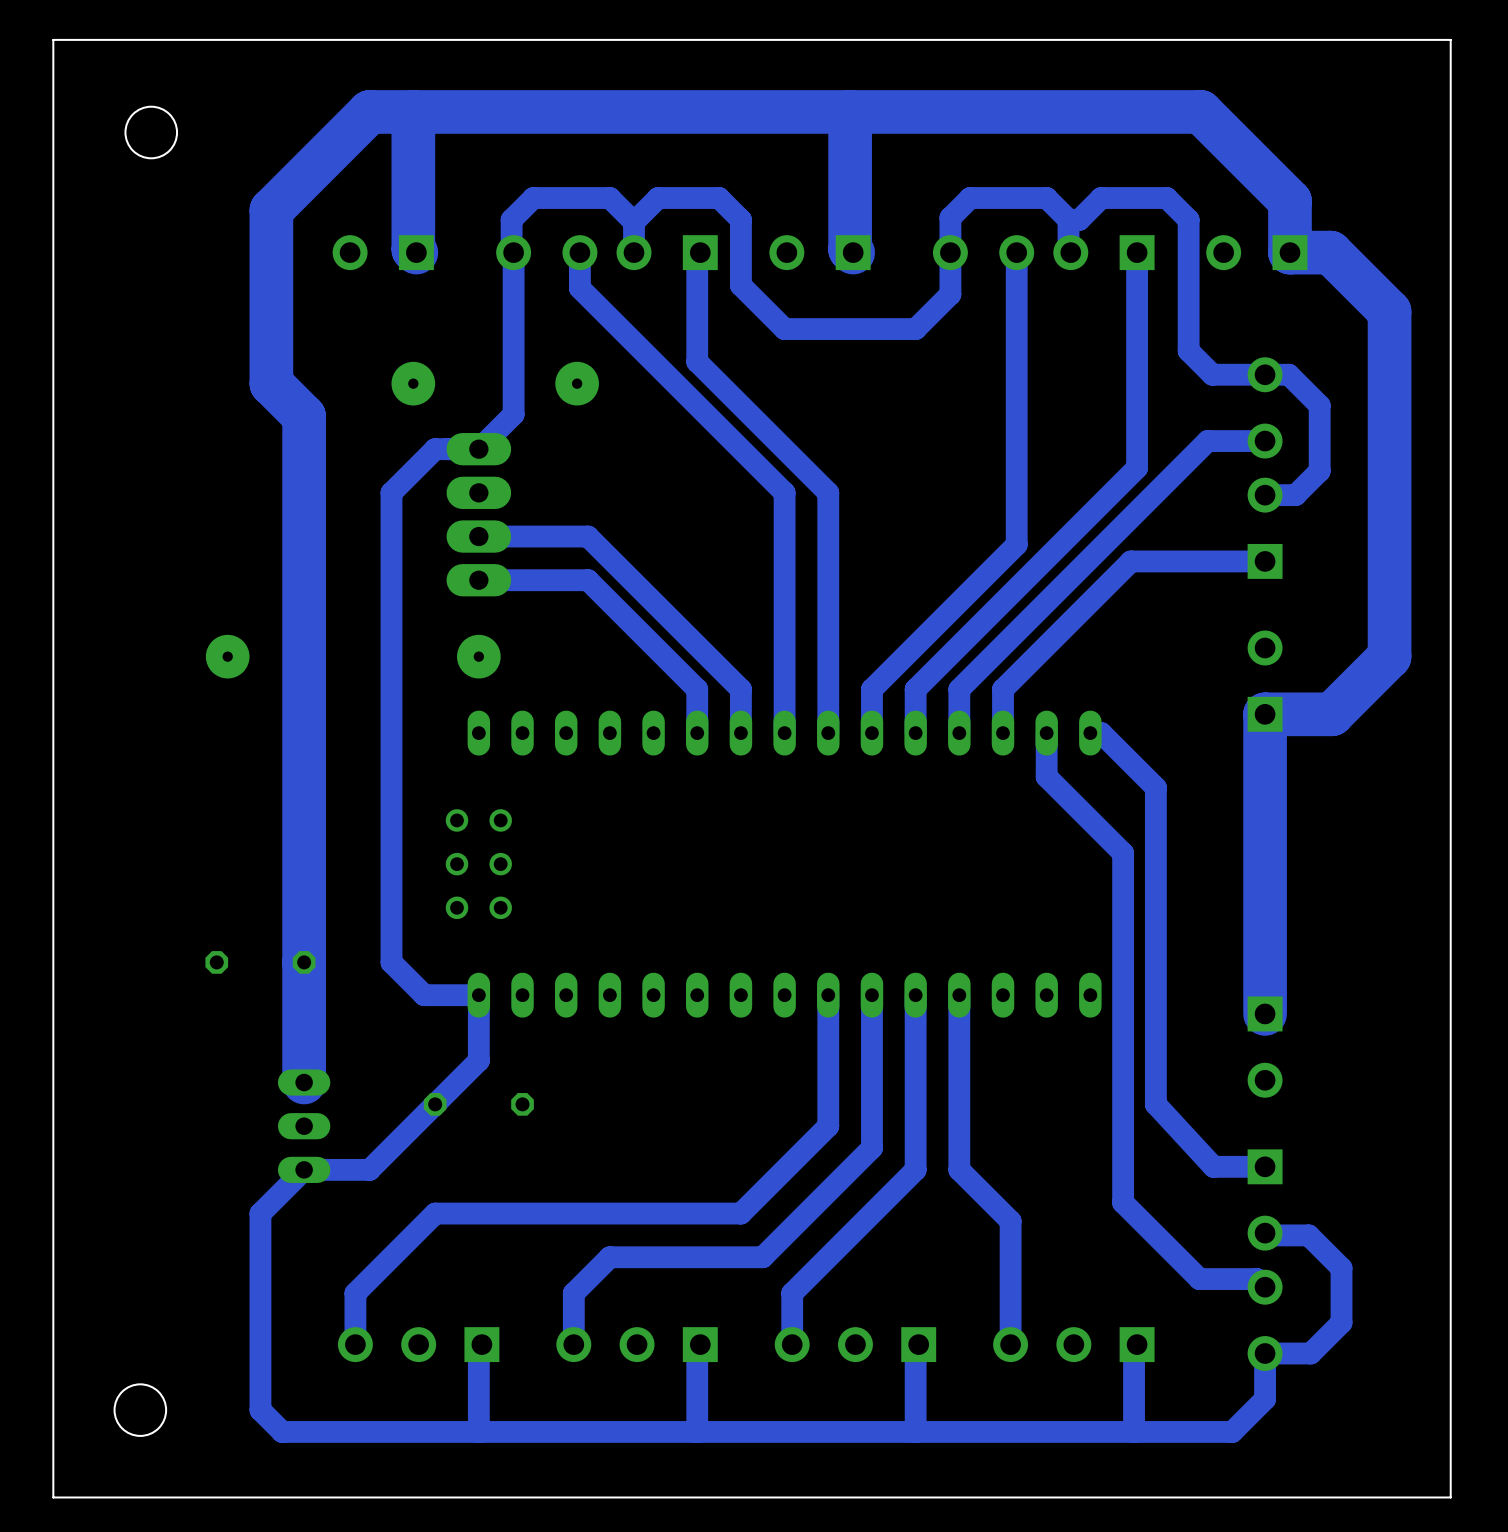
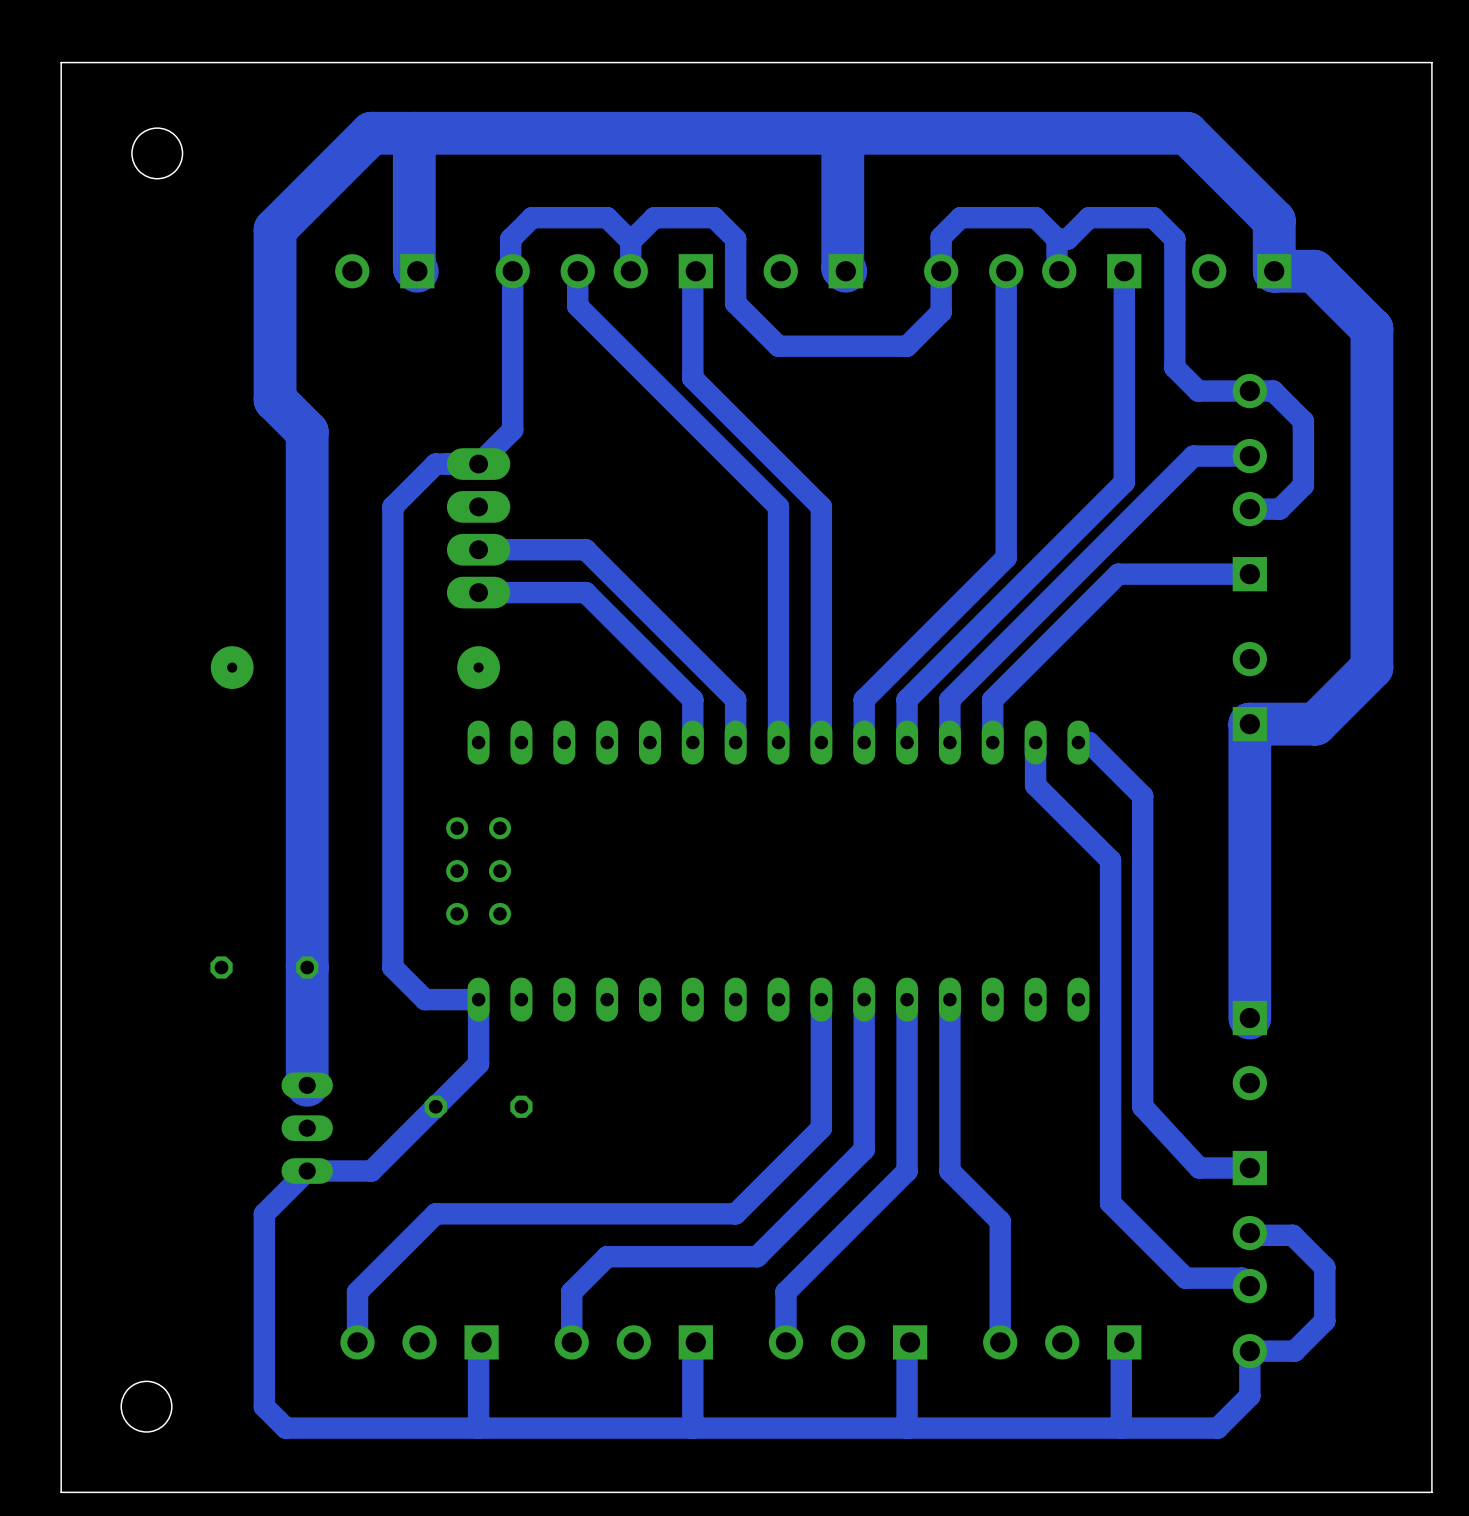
via: (413, 383) -> none
via: (577, 383) -> none

